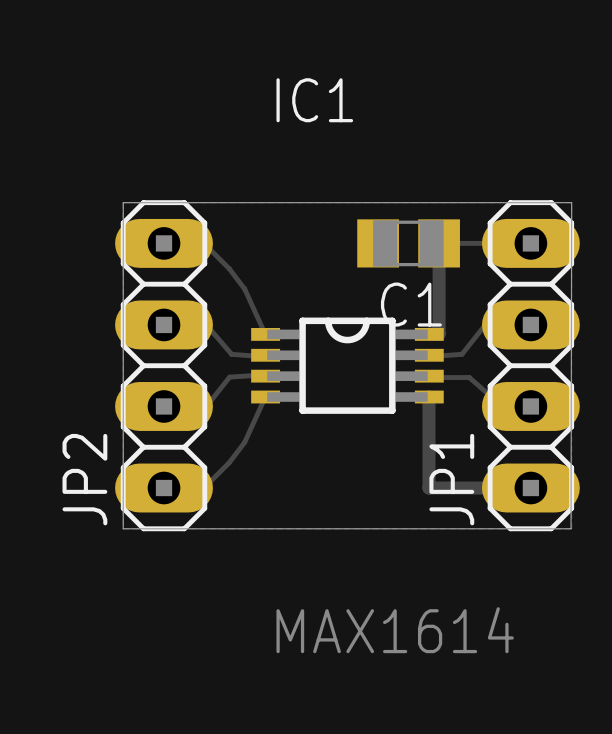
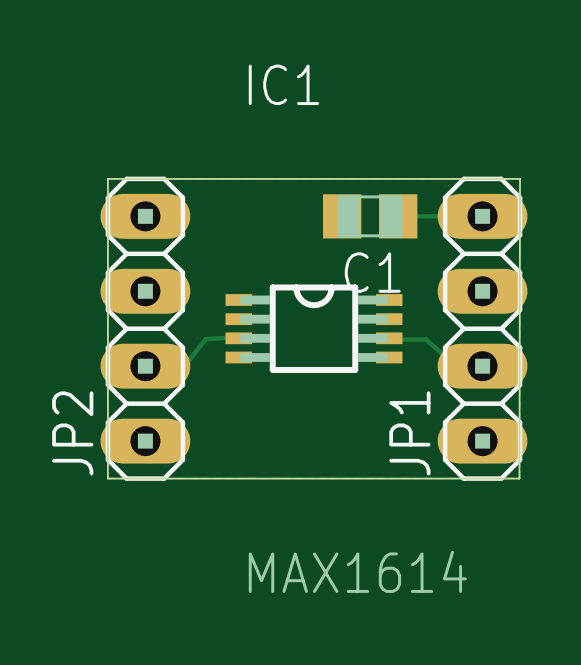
track: (164, 243) (203, 243) (229, 268) (244, 289) (265, 334) -> none
track: (439, 243) (439, 333) (429, 334) -> none
track: (164, 324) (206, 324) (231, 354) (265, 355) -> none
track: (530, 324) (485, 324) (462, 354) (429, 355) -> none
track: (265, 397) (244, 442) (229, 462) (203, 488) (164, 488) -> none
track: (428, 397) (428, 488) (530, 488) -> none

